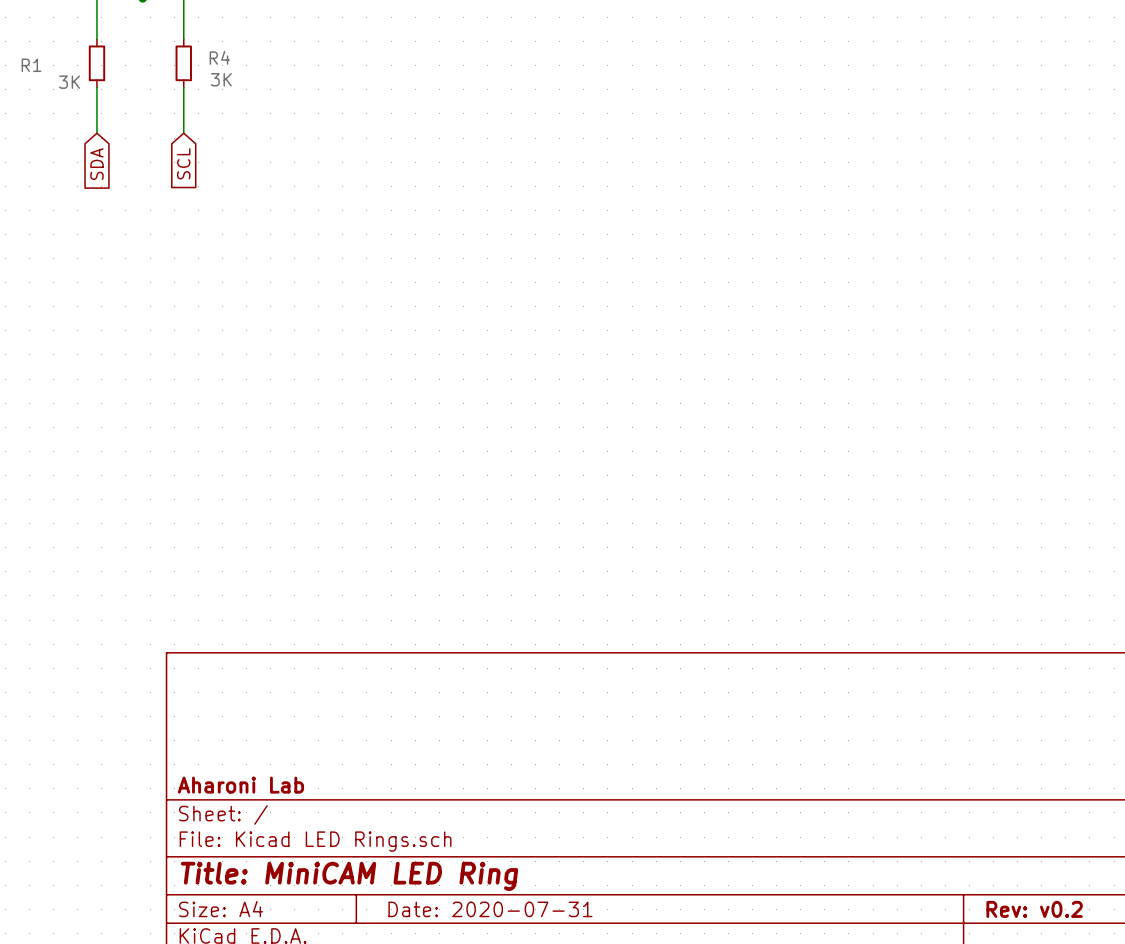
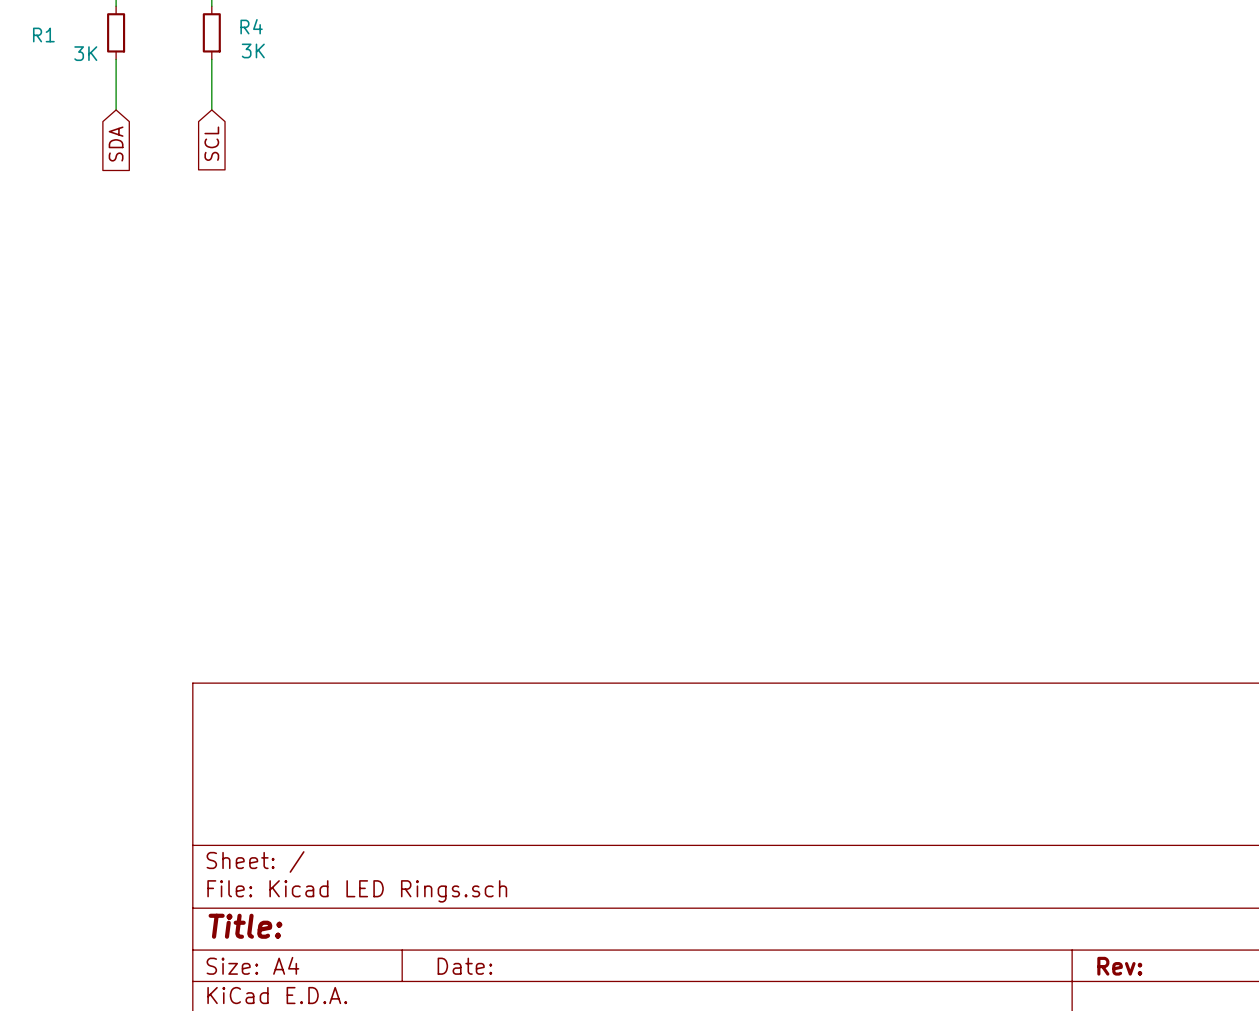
title block: Aharoni Lab (240, 785) -> none
title block: Title: MiniCAM LED Ring (349, 876) -> Title: (245, 926)
title block: Date: 2020-07-31 (490, 909) -> Date: (464, 966)
title block: Rev: v0.2 (1034, 909) -> Rev: (1119, 966)

